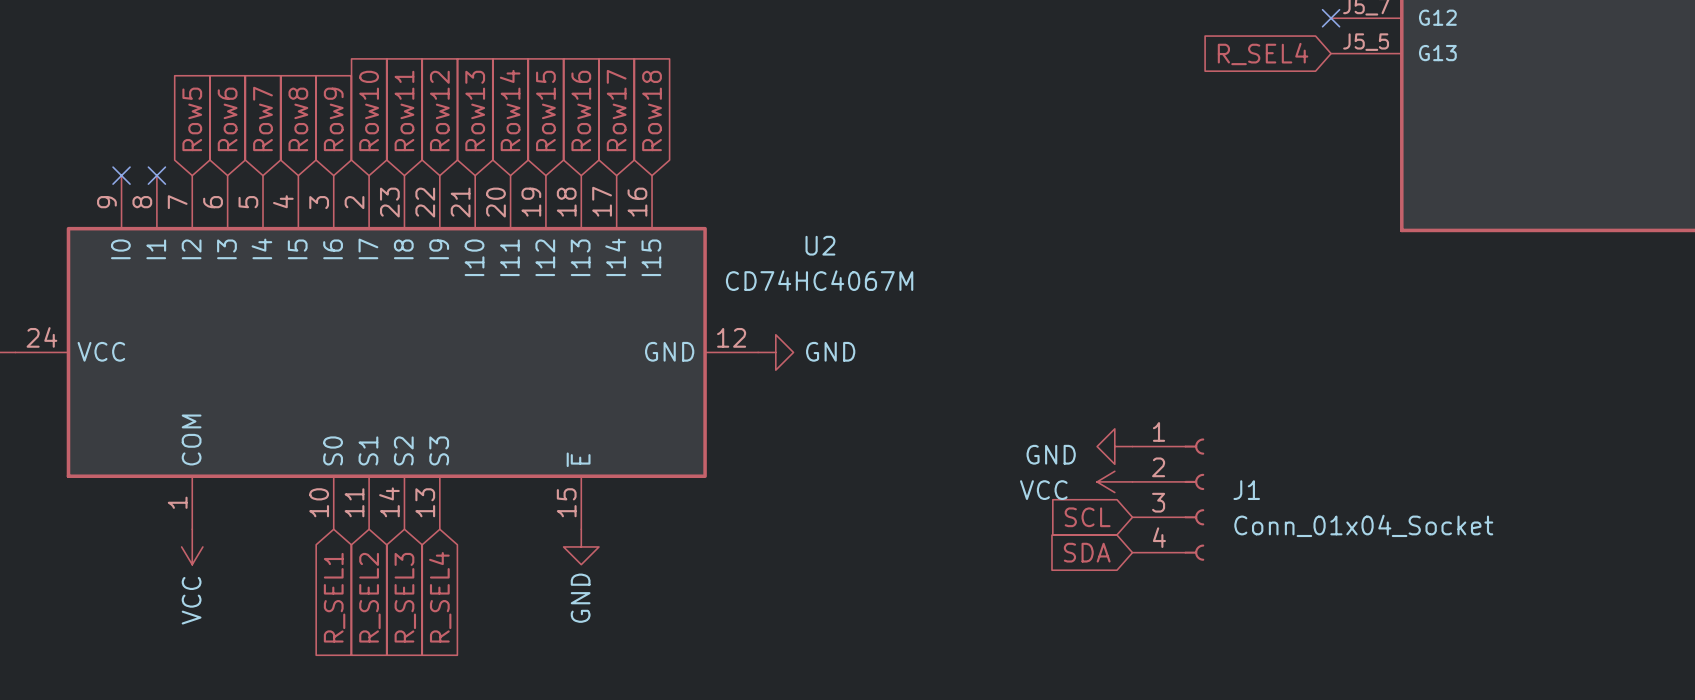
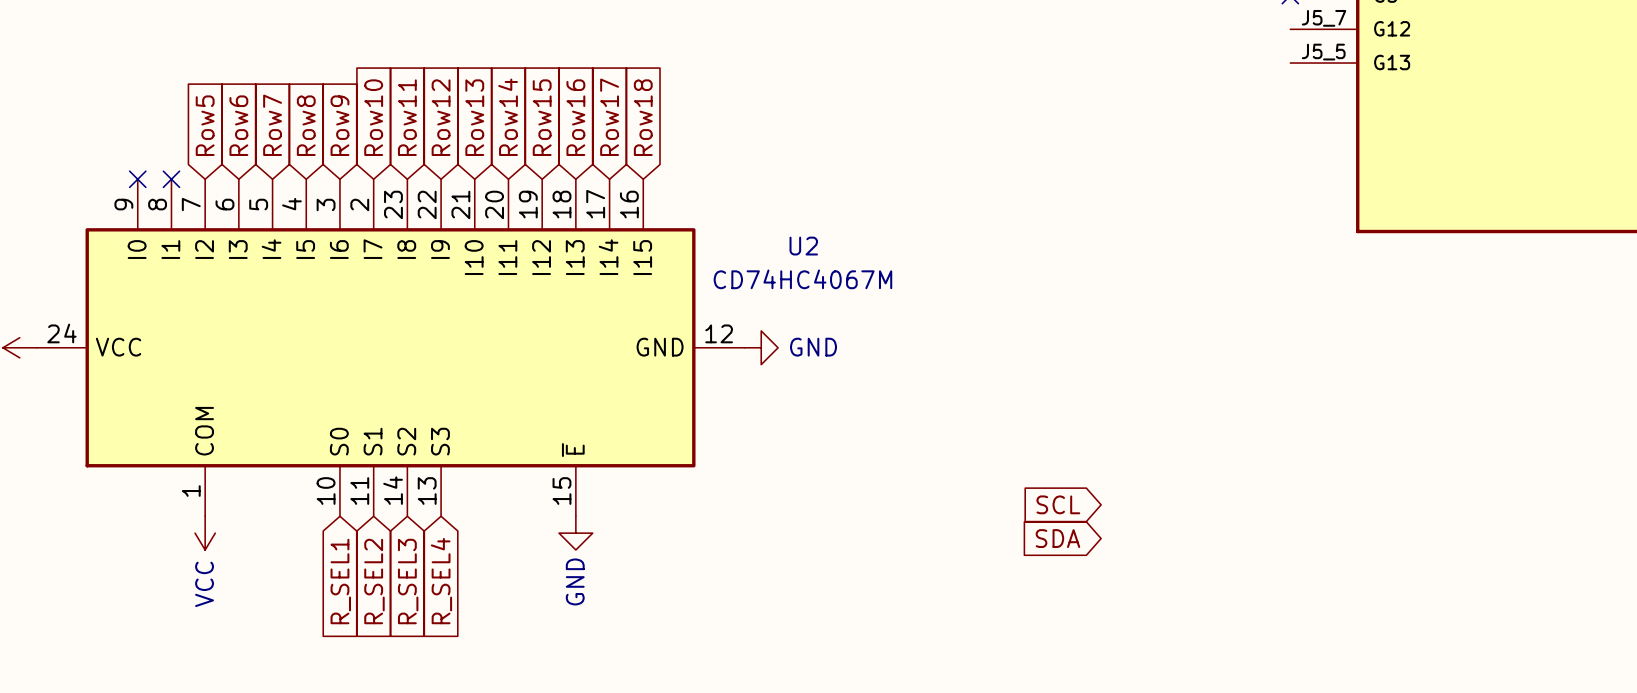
no-connect mark: (1331, 18) -> none
global label: R_SEL4 (1263, 54) -> none
power symbol: GND (1114, 446) -> none
power symbol: VCC (1114, 481) -> none
J1: Conn_01x04_Socket (1168, 499) -> none

